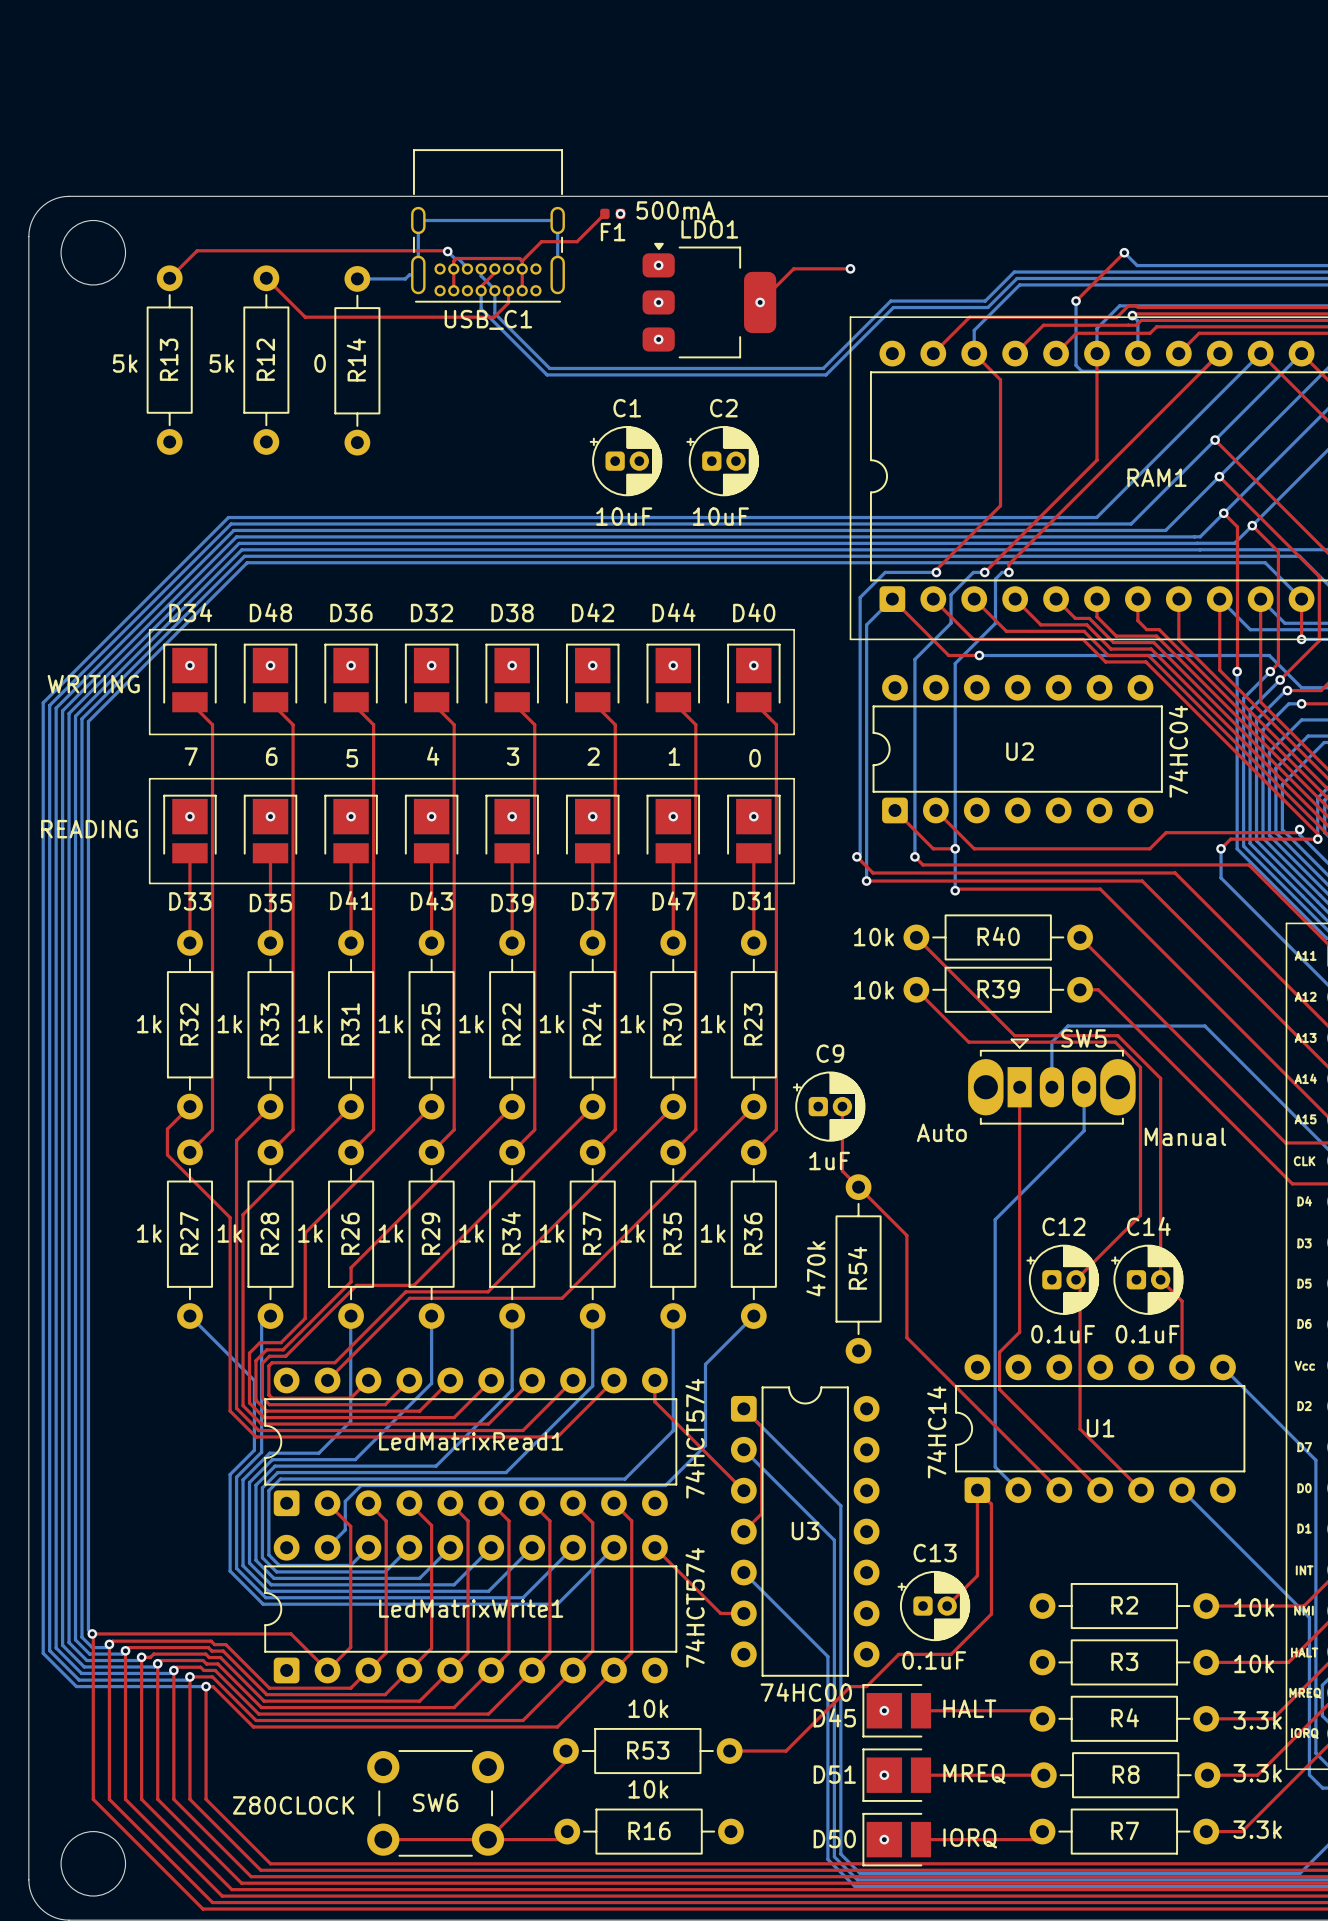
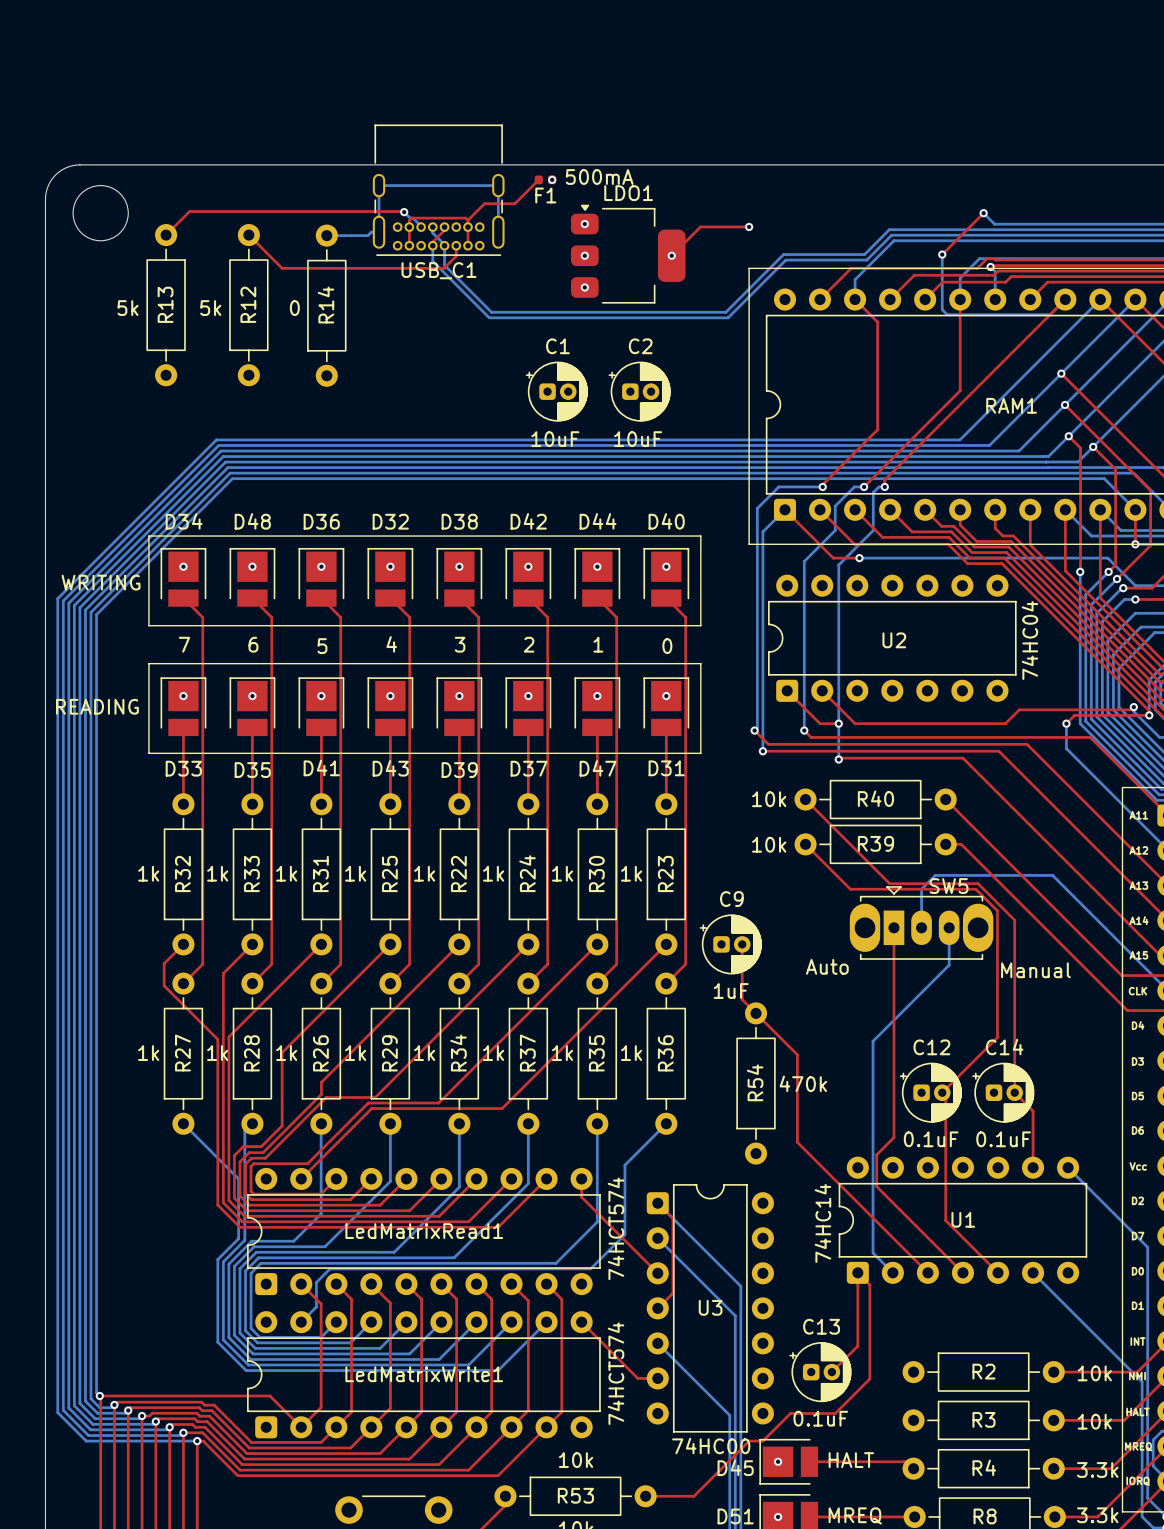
text rotation: 0° (815, 1268) -> 90° clockwise (803, 1083)
text position: 470k (815, 1268) -> 470k (803, 1083)

